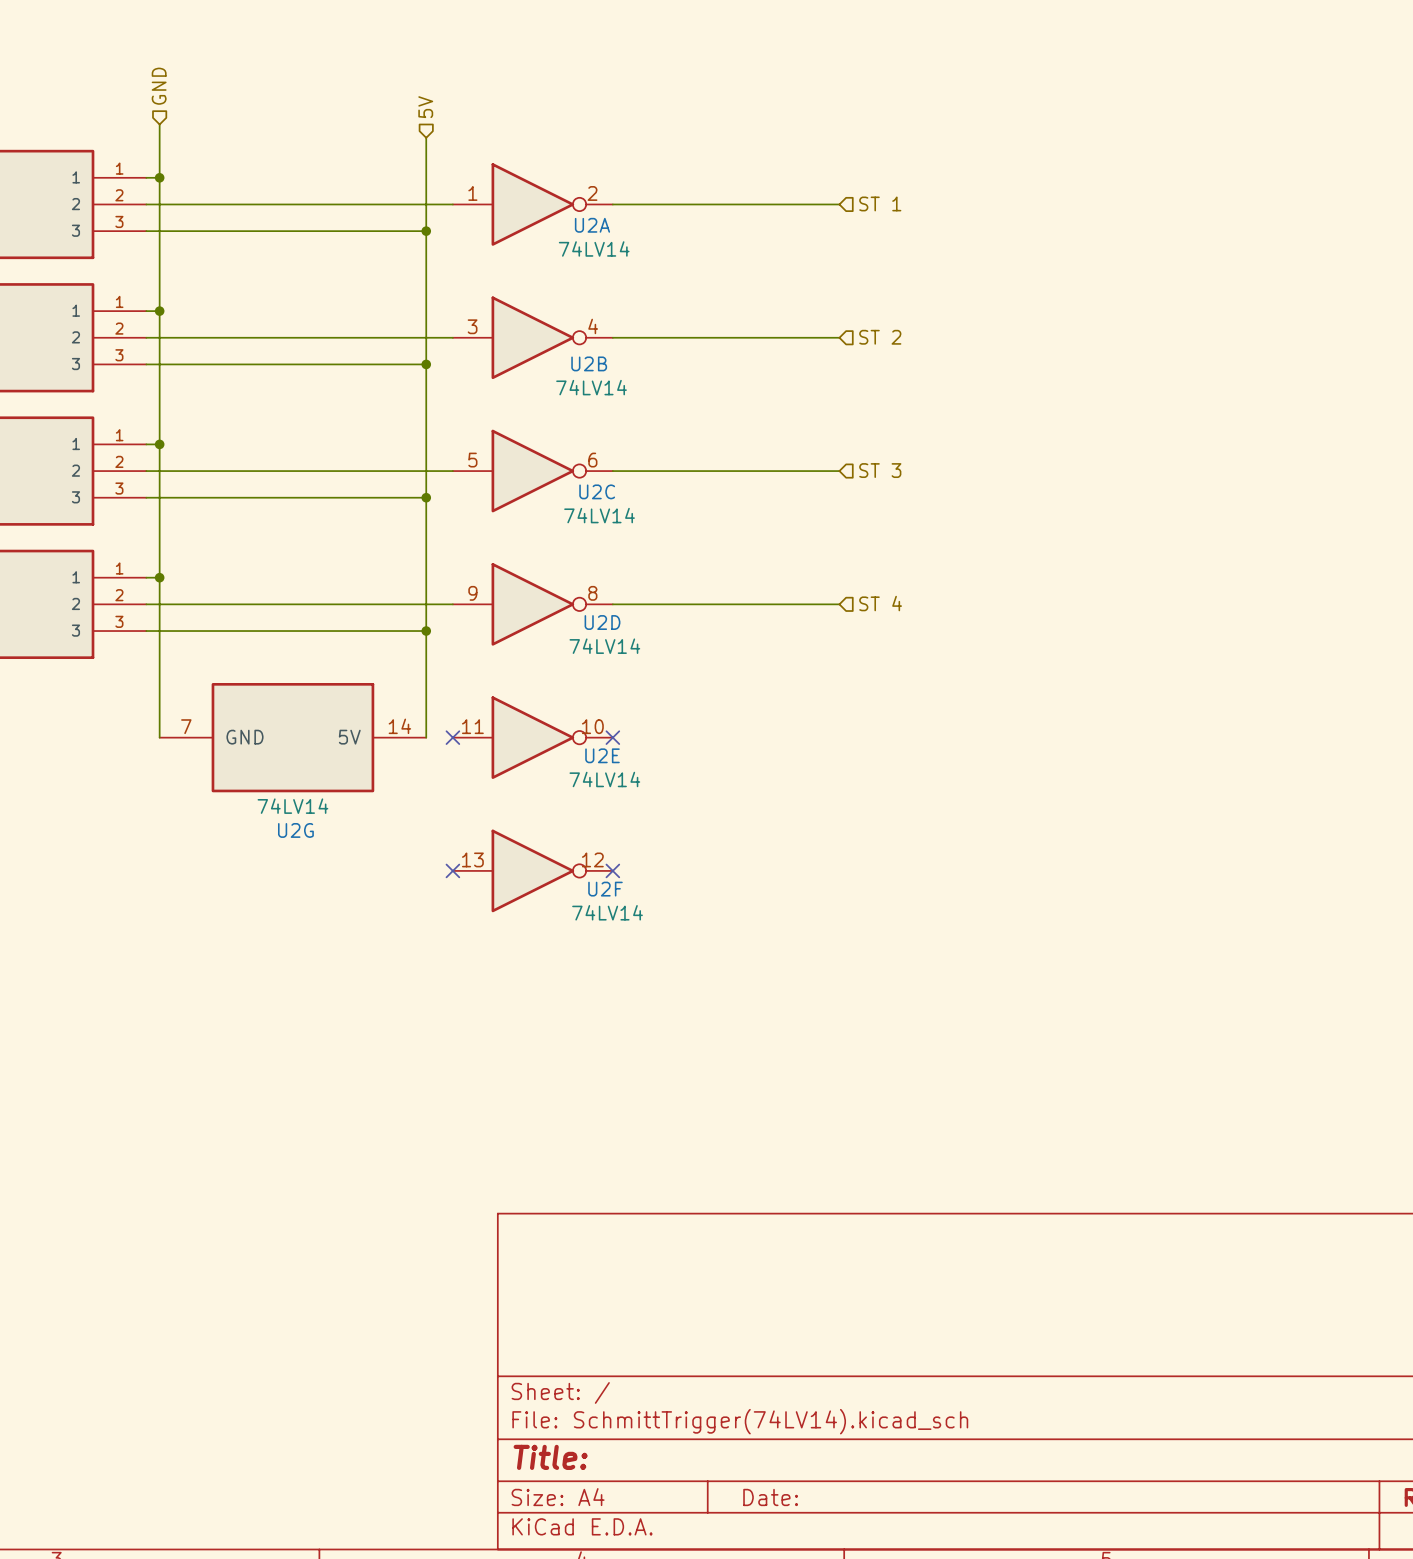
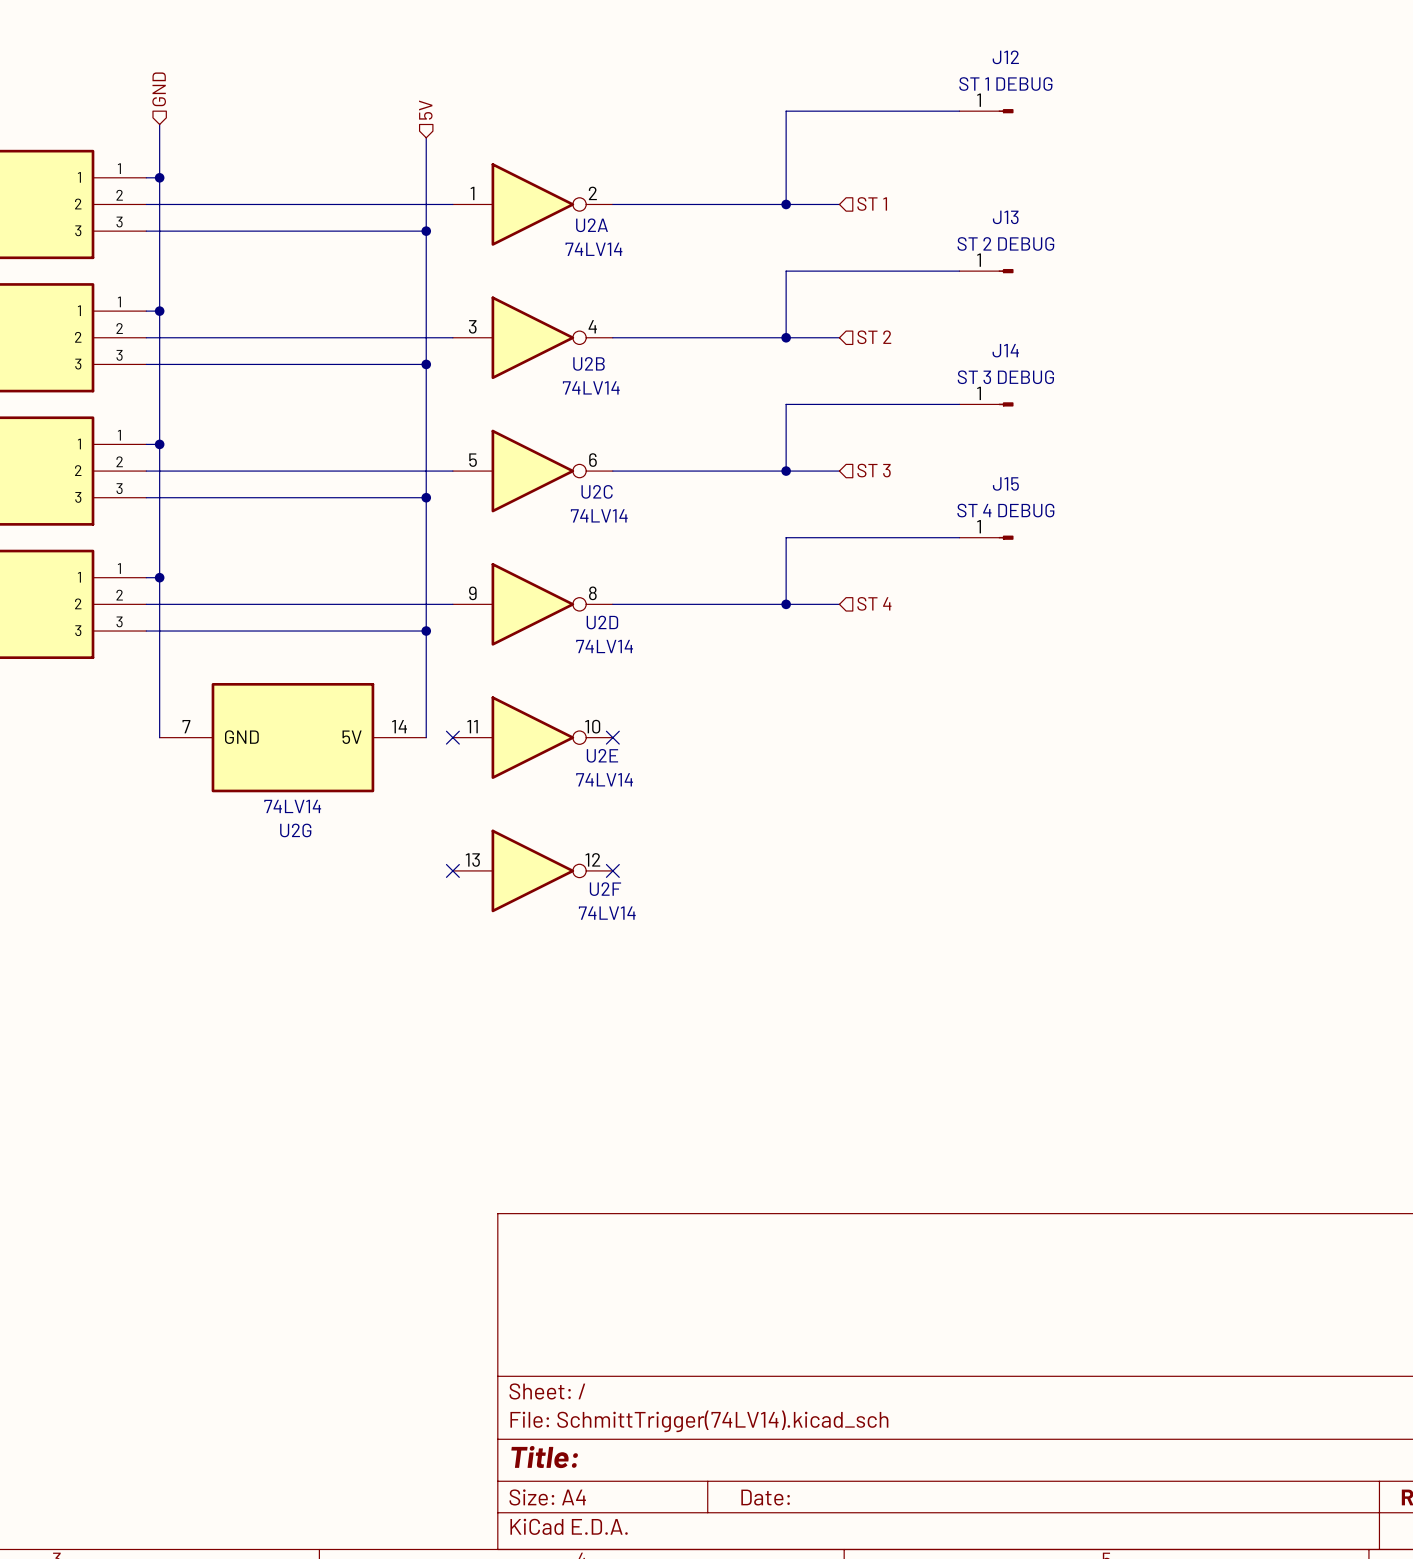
wire: none -> (959, 111) (786, 111) (786, 204)
J12: none -> ST 1 DEBUG (986, 111)
junction: none -> (786, 204)
wire: none -> (959, 271) (786, 271) (786, 337)
J13: none -> ST 2 DEBUG (986, 271)
junction: none -> (786, 337)
wire: none -> (959, 404) (786, 404) (786, 471)
J14: none -> ST 3 DEBUG (986, 404)
junction: none -> (786, 471)
wire: none -> (959, 537) (786, 537) (786, 604)
J15: none -> ST 4 DEBUG (986, 537)
junction: none -> (786, 604)

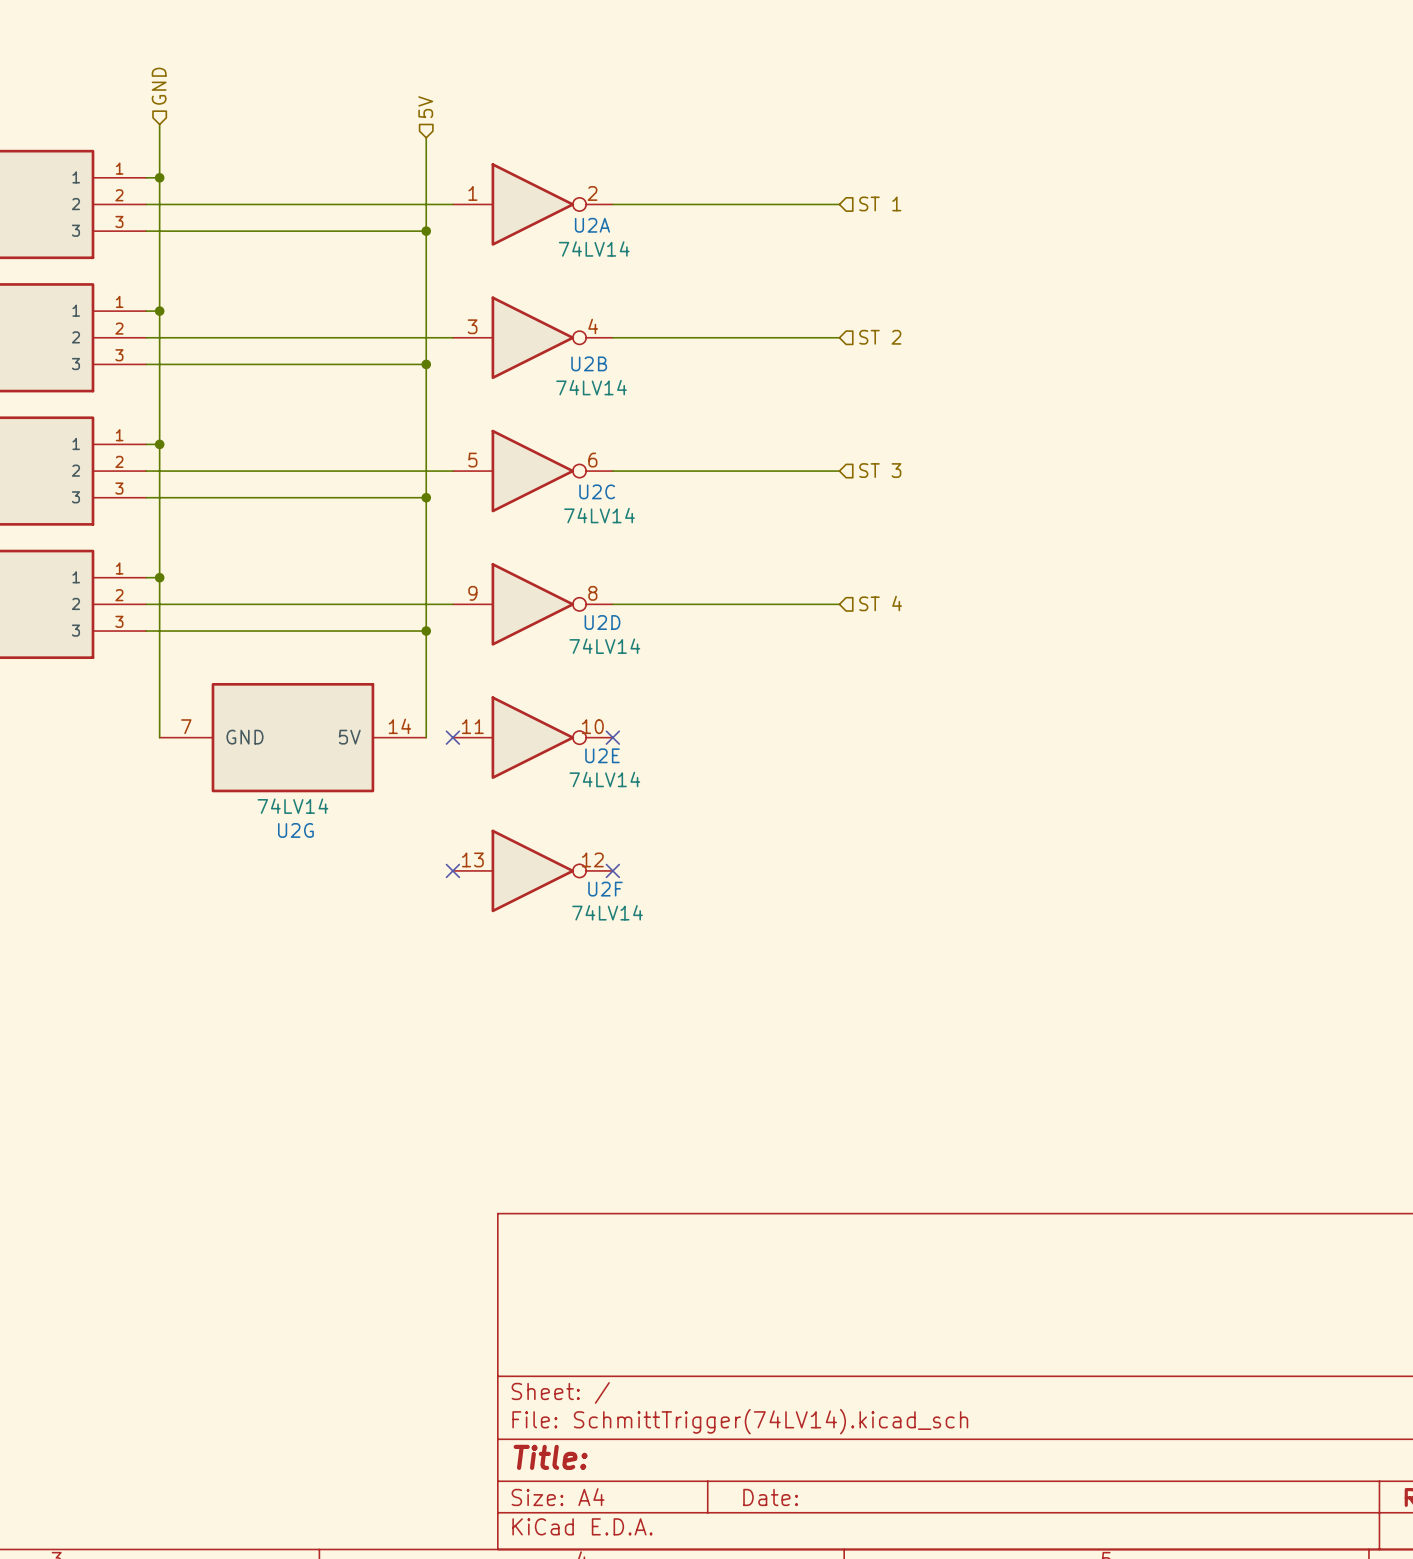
wire: (959, 111) (786, 111) (786, 204) -> none
J12: ST 1 DEBUG (986, 111) -> none
junction: (786, 204) -> none
wire: (959, 271) (786, 271) (786, 337) -> none
J13: ST 2 DEBUG (986, 271) -> none
junction: (786, 337) -> none
wire: (959, 404) (786, 404) (786, 471) -> none
J14: ST 3 DEBUG (986, 404) -> none
junction: (786, 471) -> none
wire: (959, 537) (786, 537) (786, 604) -> none
J15: ST 4 DEBUG (986, 537) -> none
junction: (786, 604) -> none

